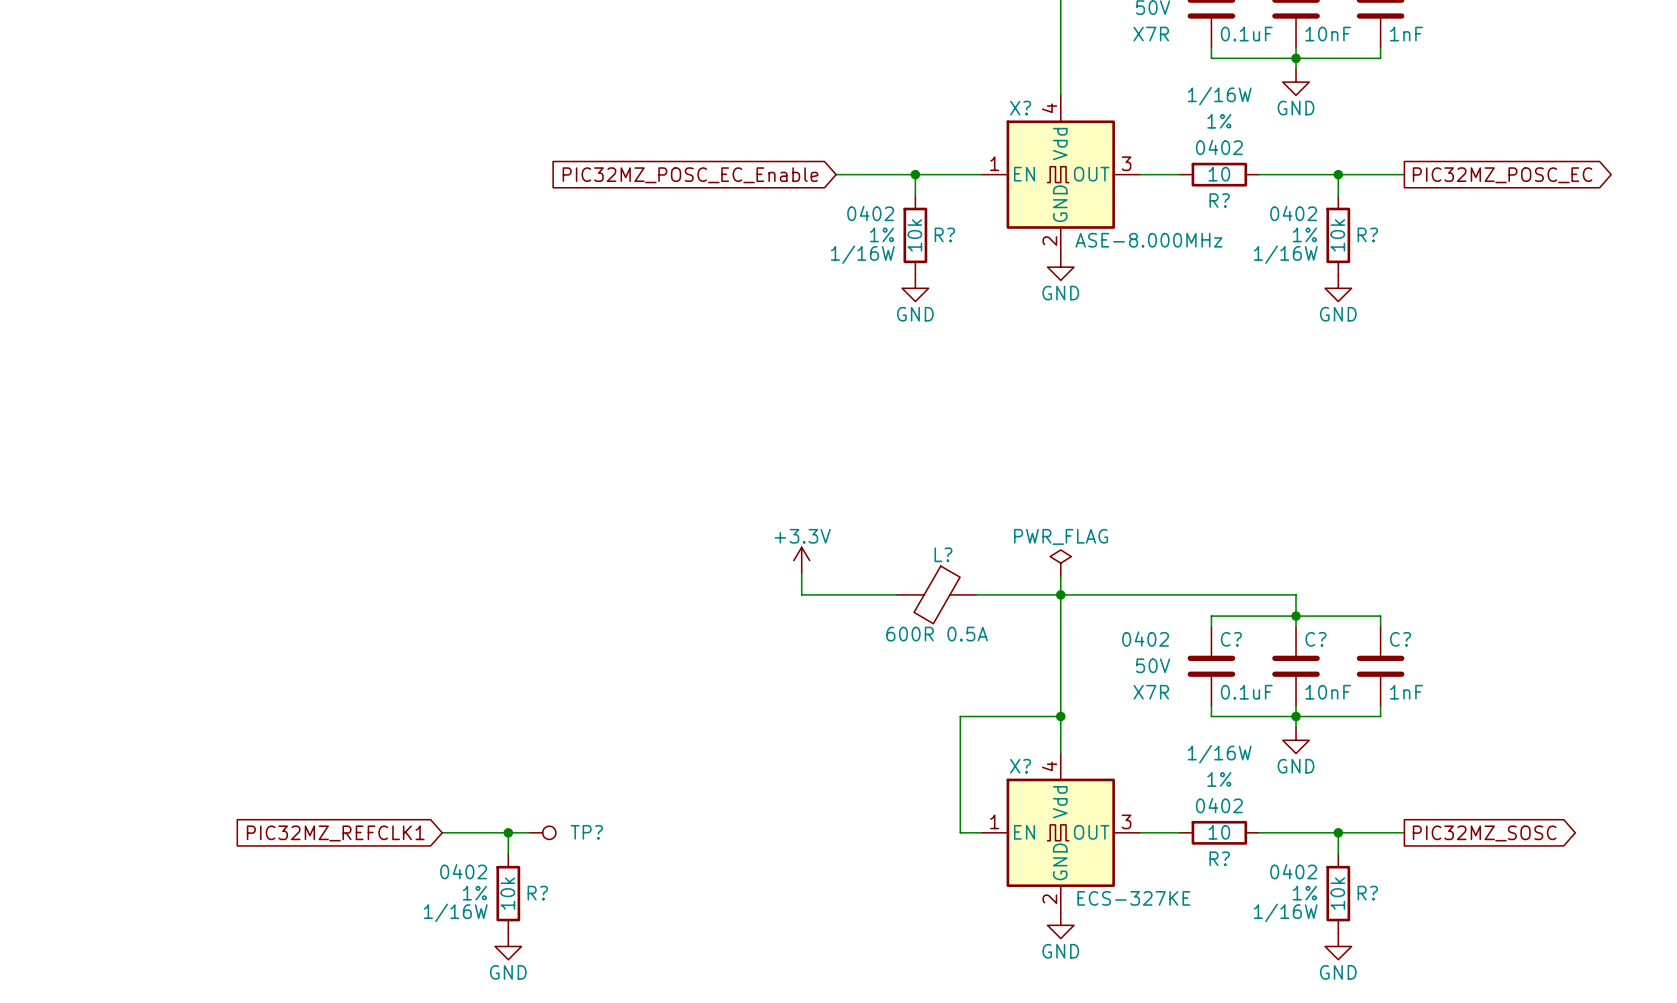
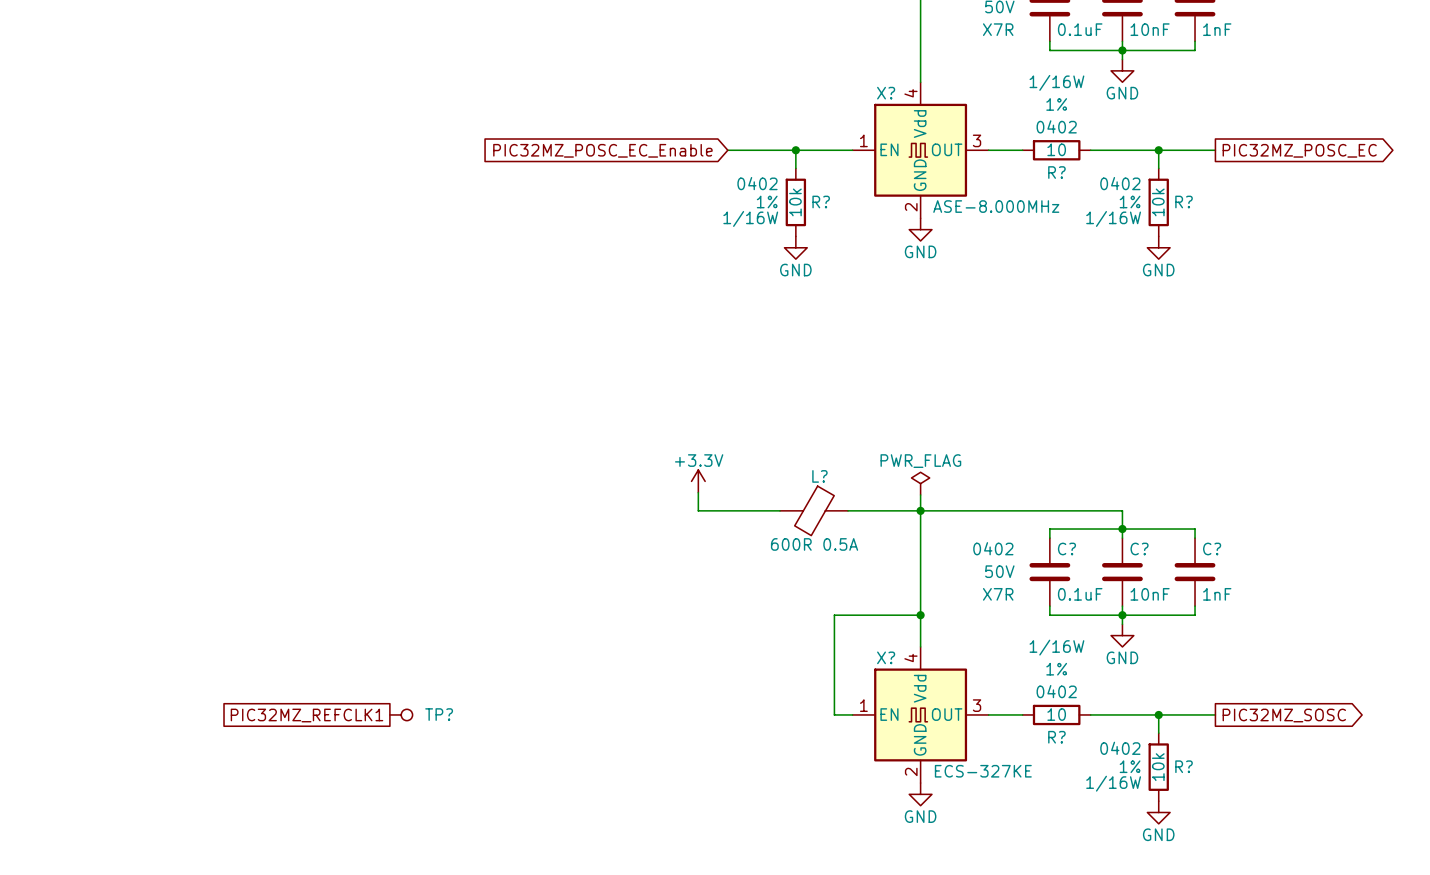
wire: (442, 832) (529, 832) -> none
wire: (508, 832) (508, 853) -> none
junction: (508, 832) -> none
TP? position: (542, 832) -> (401, 714)
global label shape: input (335, 833) -> passive (307, 715)
R?: 10k (508, 893) -> none
power symbol: GND (508, 946) -> none

